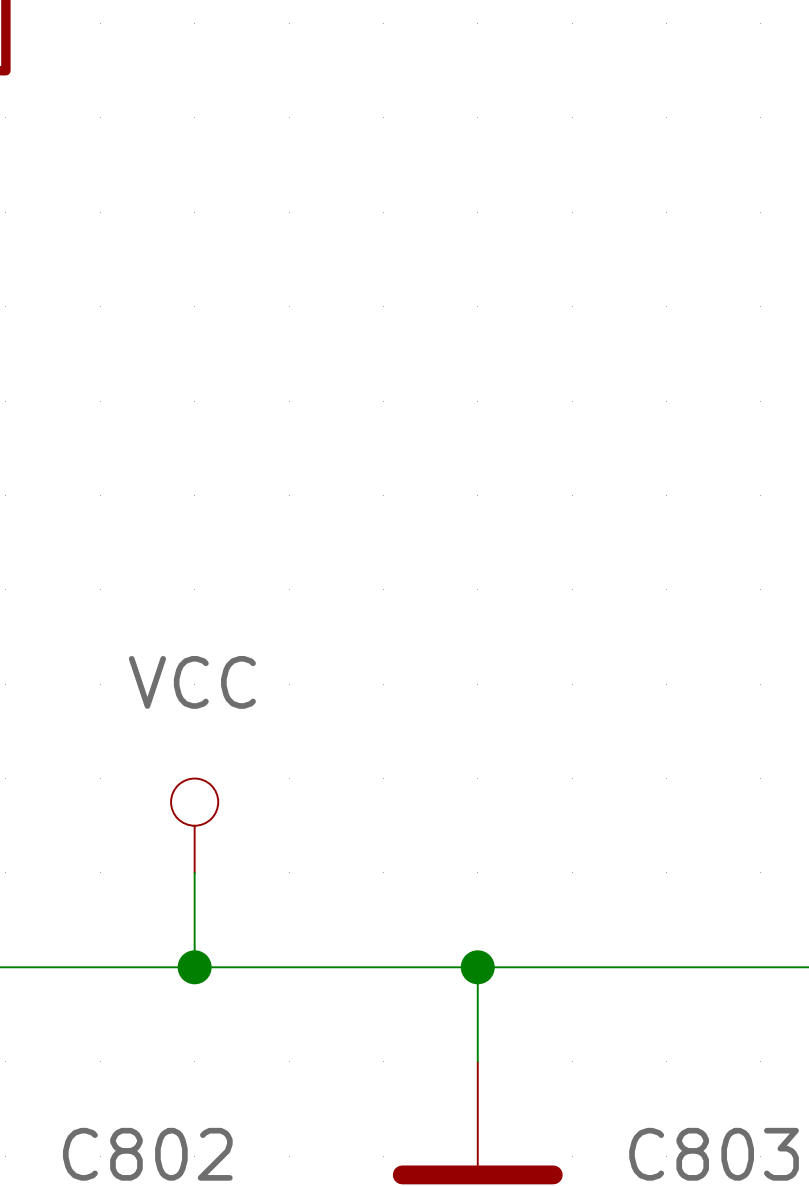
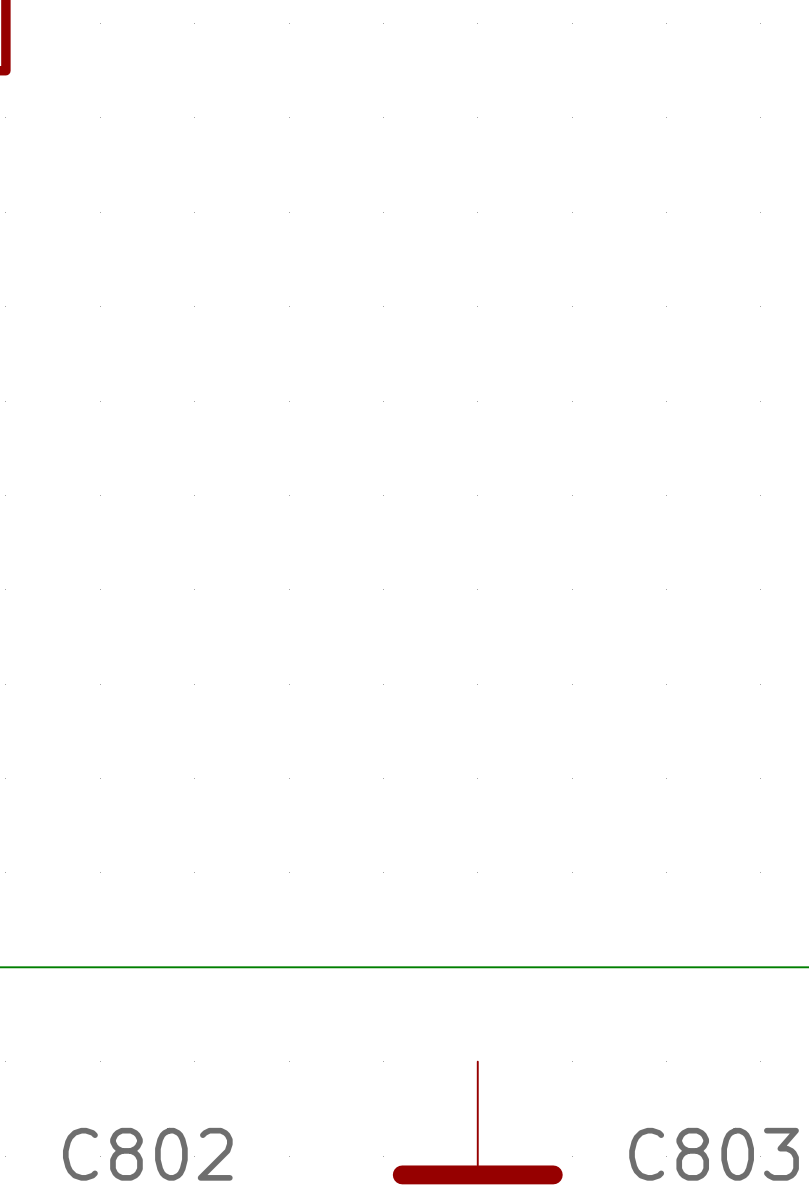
power symbol: VCC (194, 825) -> none
wire: (194, 872) (194, 967) -> none
junction: (194, 967) -> none
wire: (477, 967) (477, 1061) -> none
junction: (477, 967) -> none

